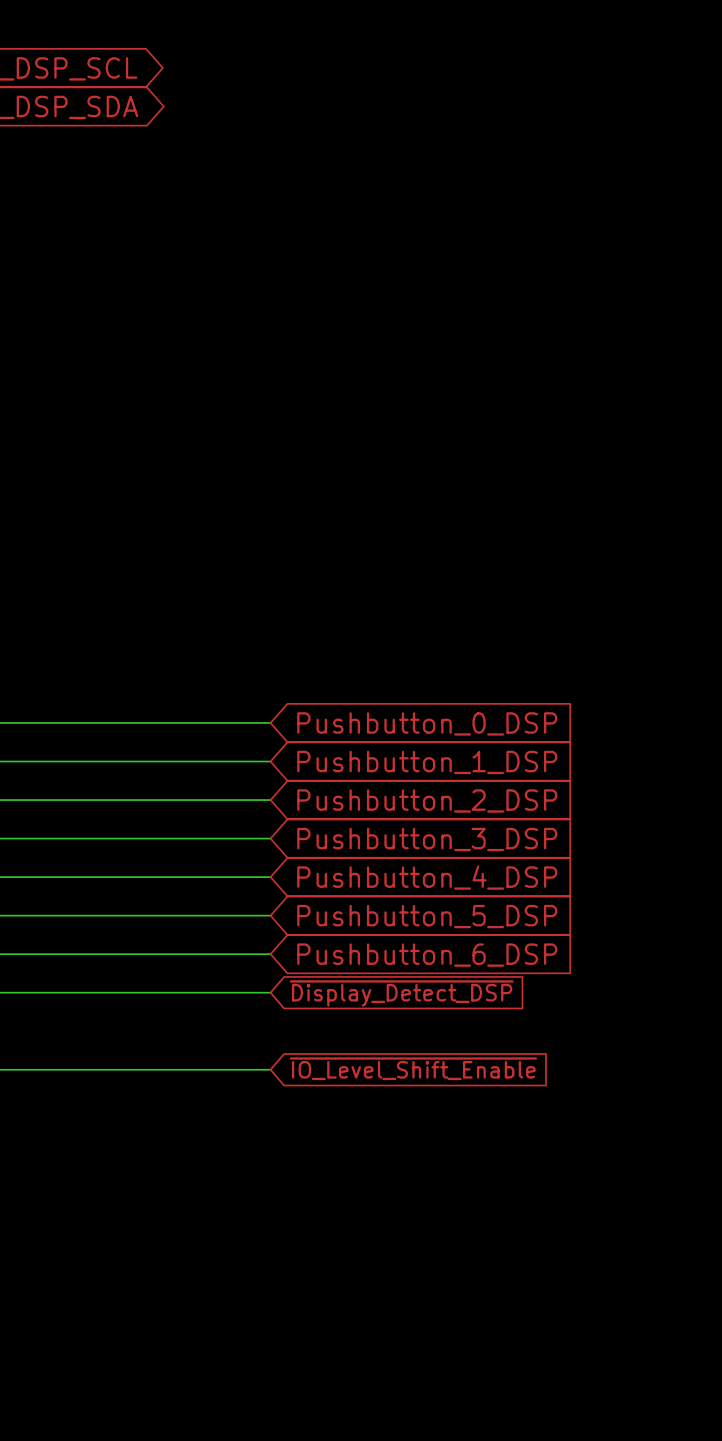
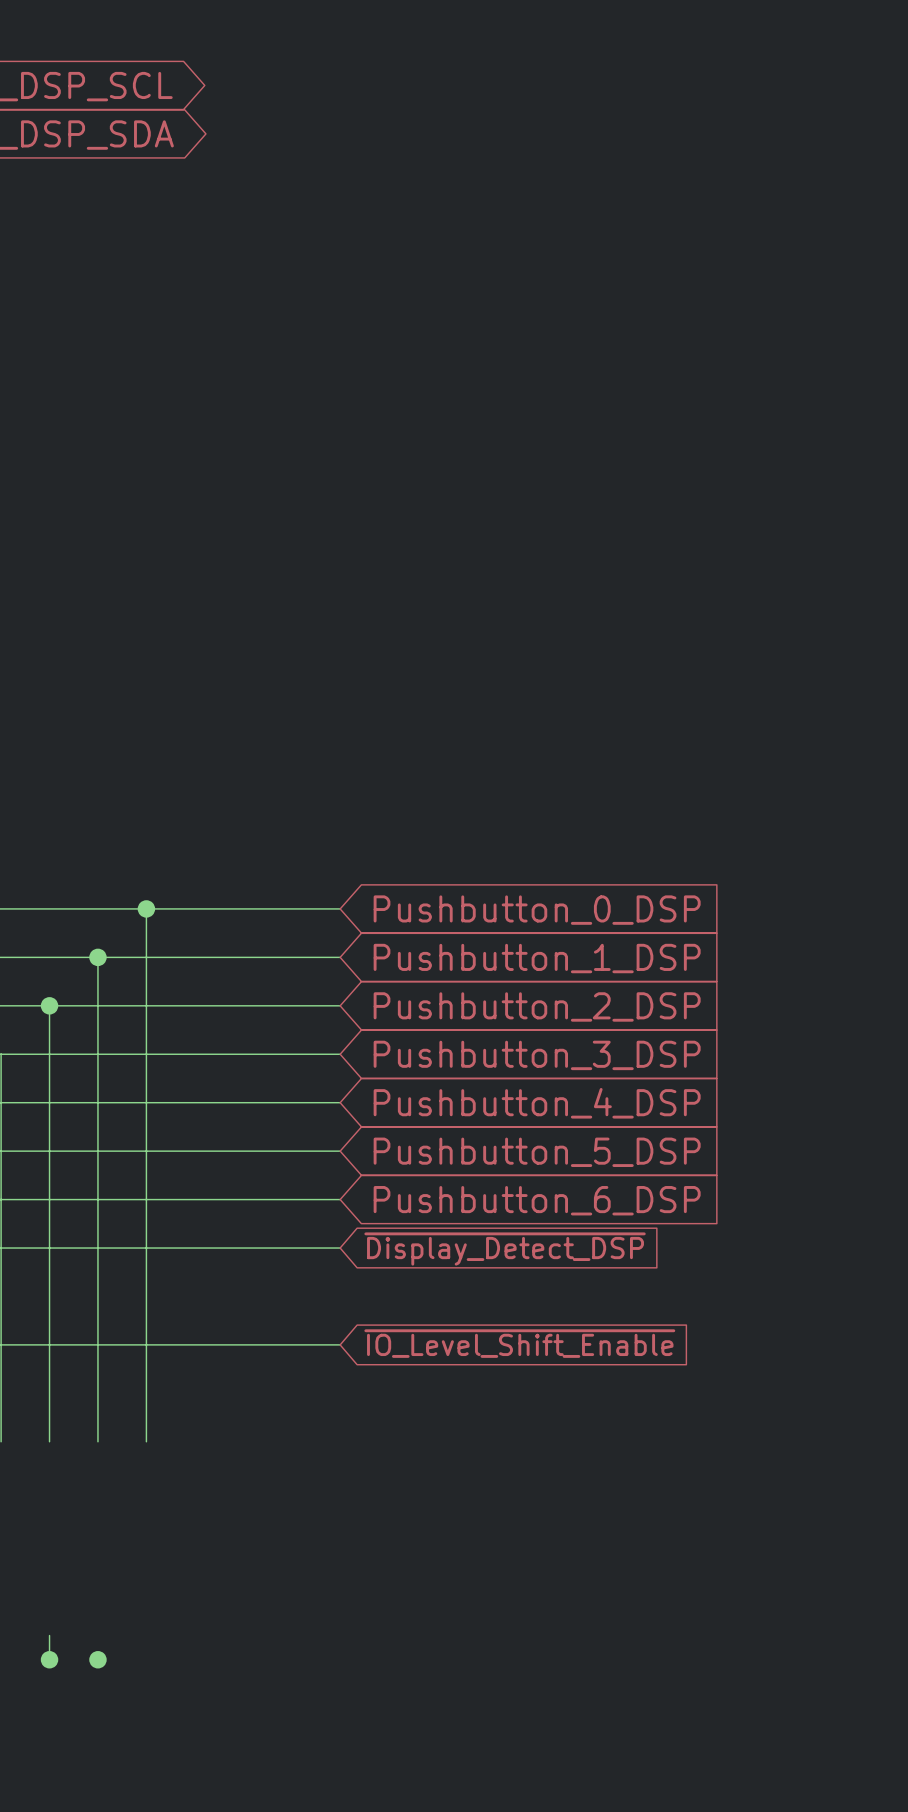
wire: none -> (146, 908) (146, 1441)
junction: none -> (146, 908)
wire: none -> (97, 957) (97, 1441)
junction: none -> (97, 957)
wire: none -> (49, 1005) (49, 1441)
junction: none -> (49, 1005)
wire: none -> (1, 1054) (1, 1441)
wire: none -> (49, 1635) (49, 1659)
junction: none -> (49, 1659)
junction: none -> (97, 1659)

